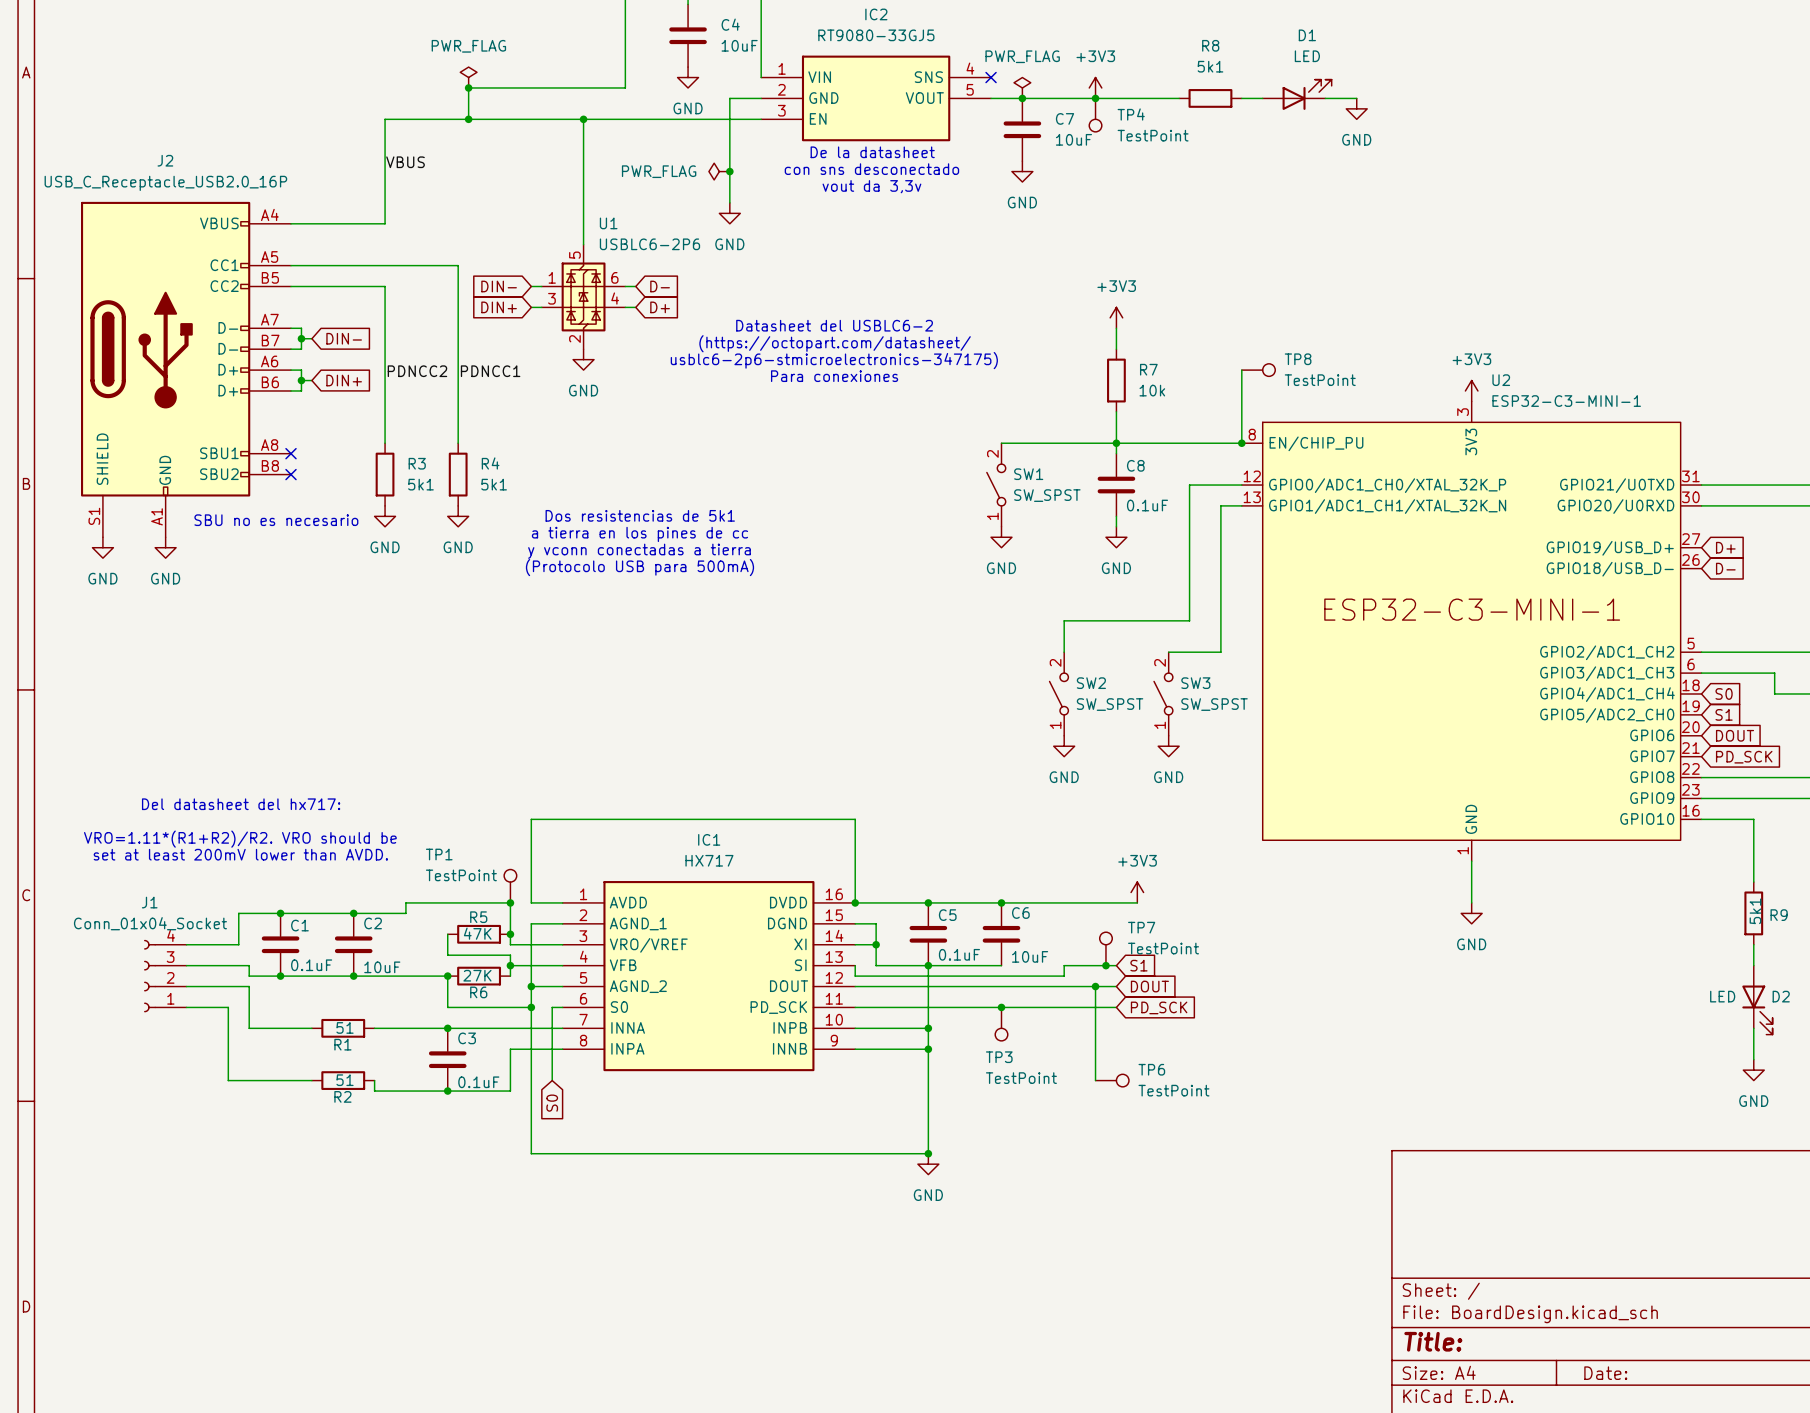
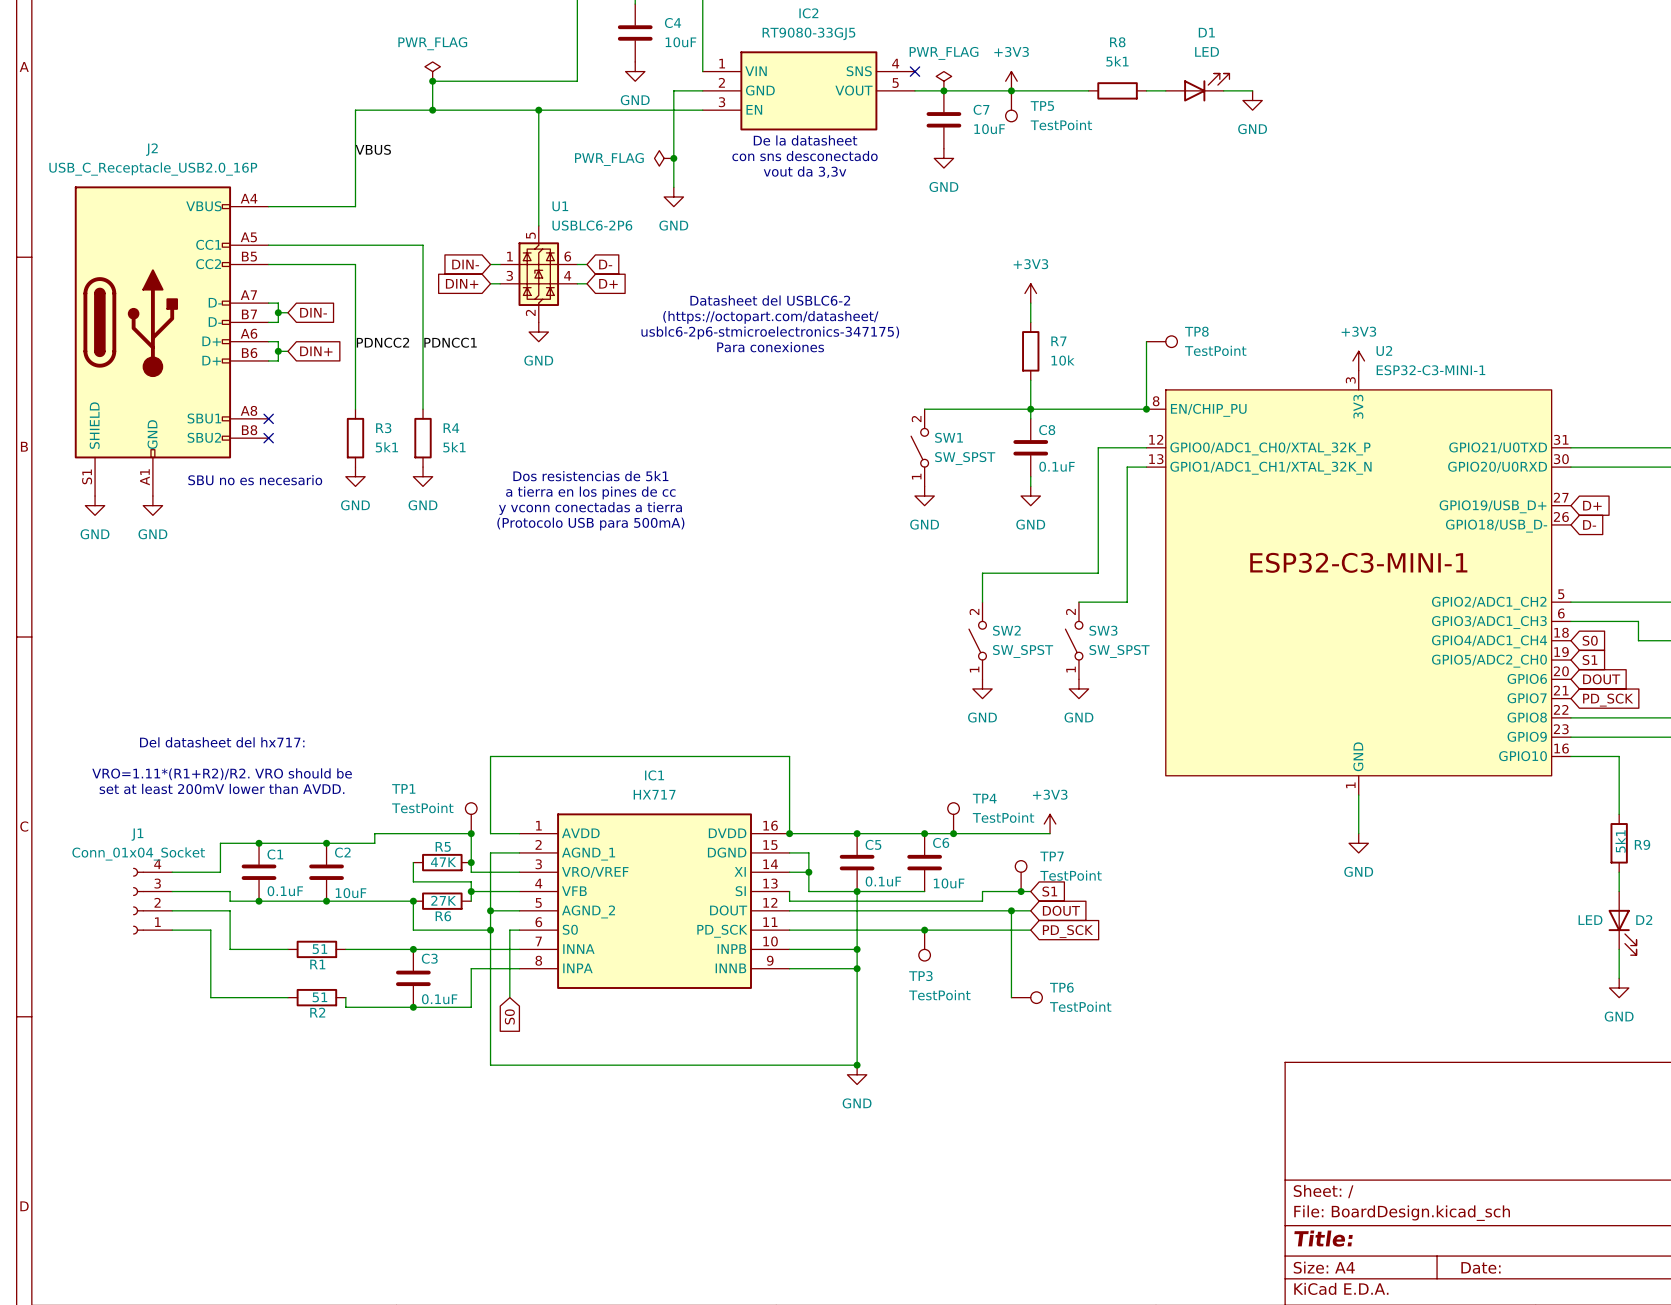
TP4 name: TP4 (1131, 114) -> TP5 (1042, 106)
TP4: none -> TestPoint (953, 818)
junction: none -> (953, 833)

